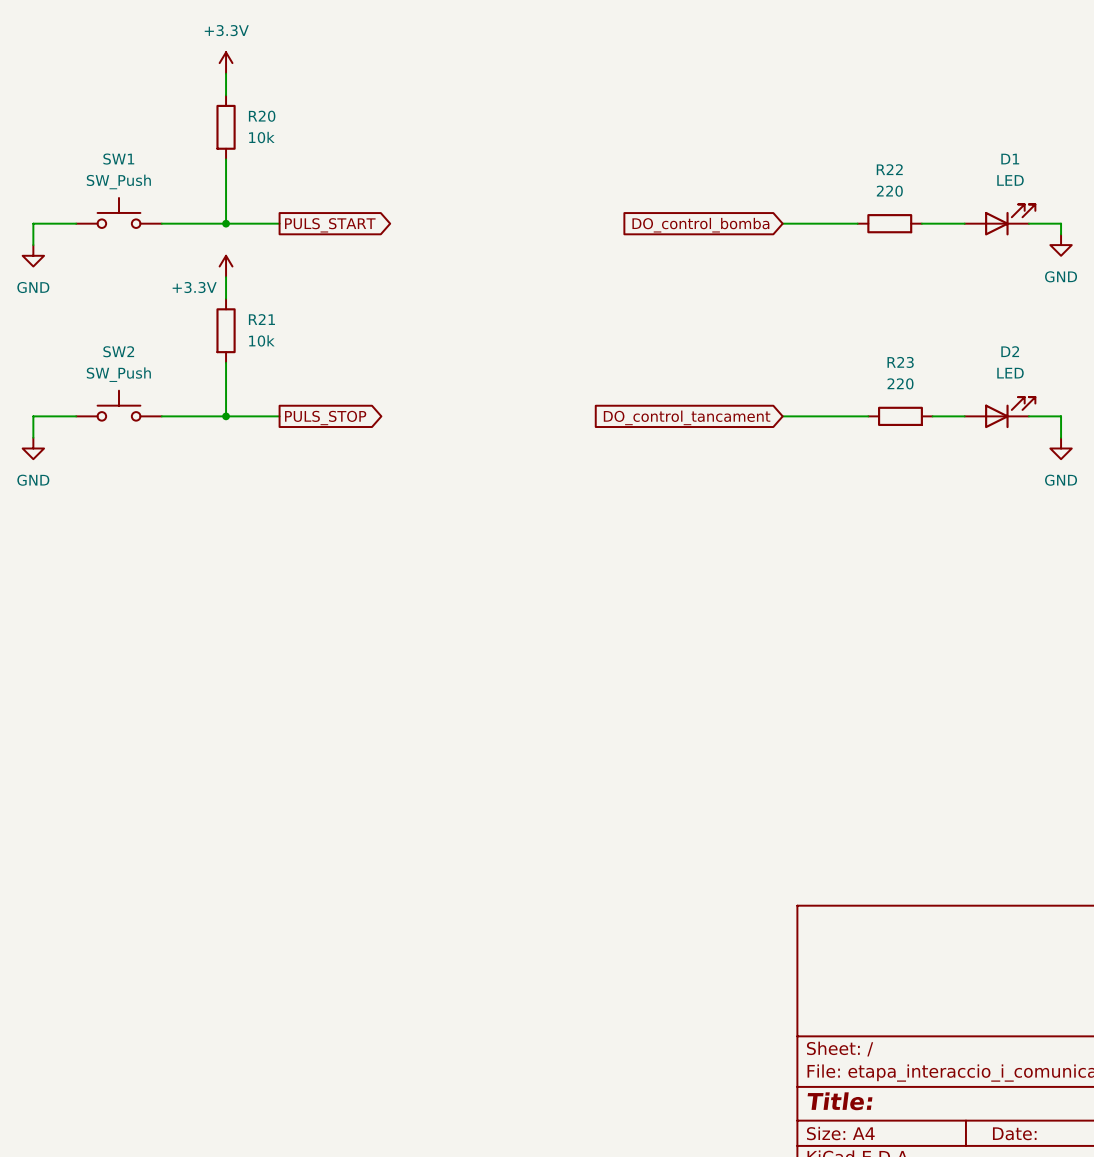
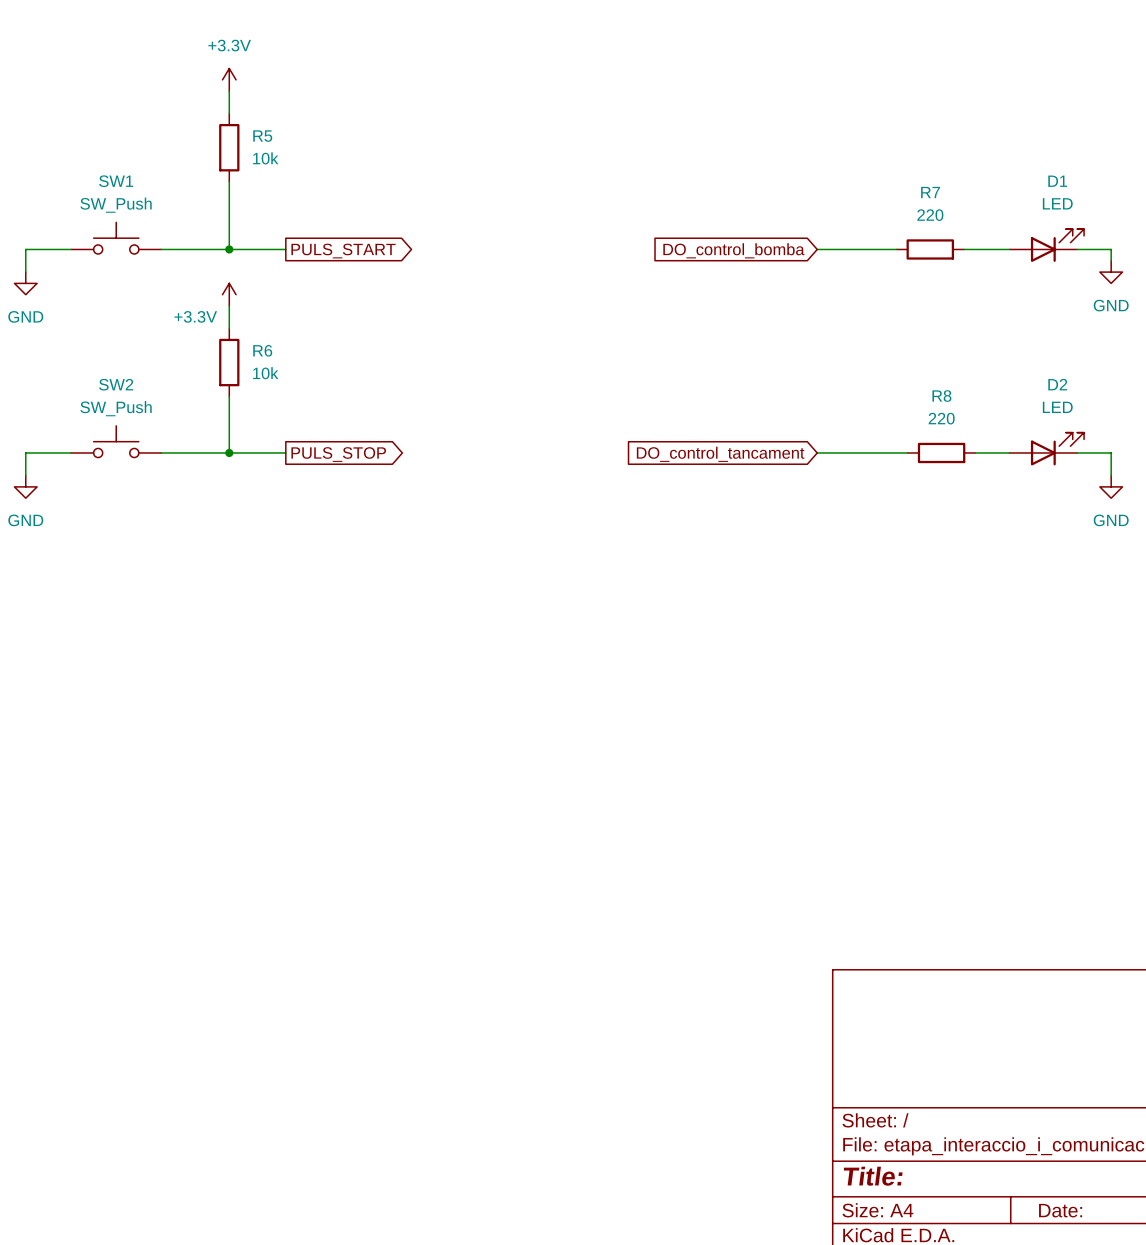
R20 name: R20 (262, 116) -> R5 (262, 136)
R22 name: R22 (889, 169) -> R7 (930, 192)
R21 name: R21 (261, 319) -> R6 (262, 350)
R23 name: R23 (900, 362) -> R8 (941, 396)

